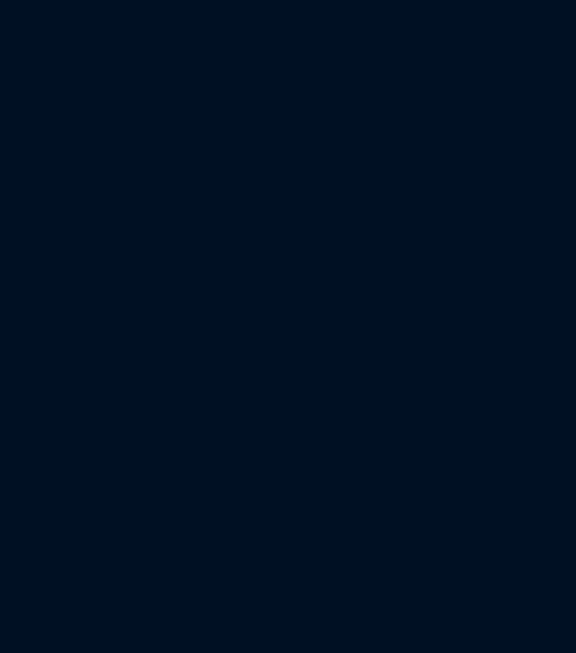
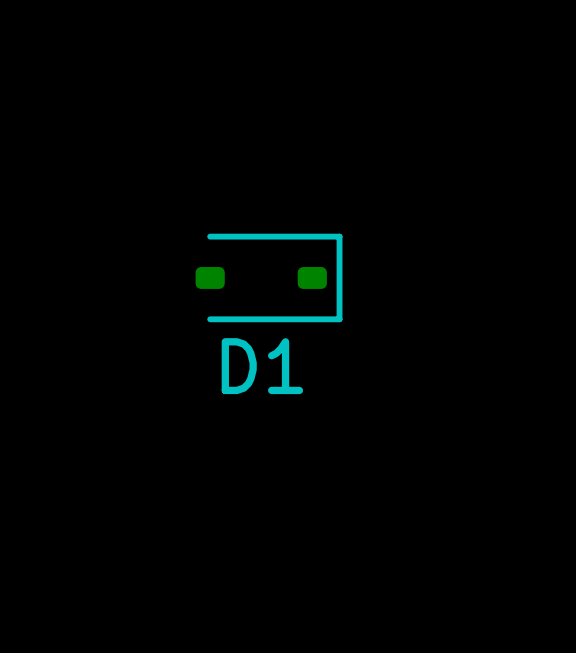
D1: none -> (269, 277)

